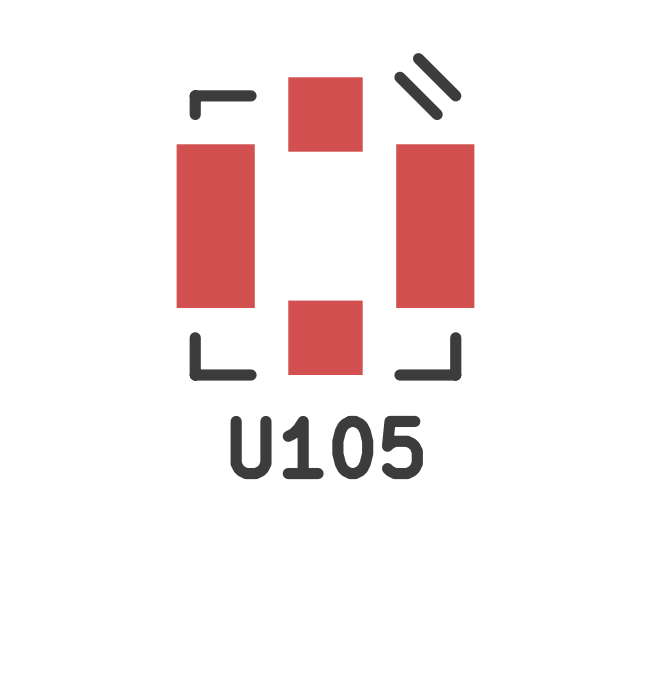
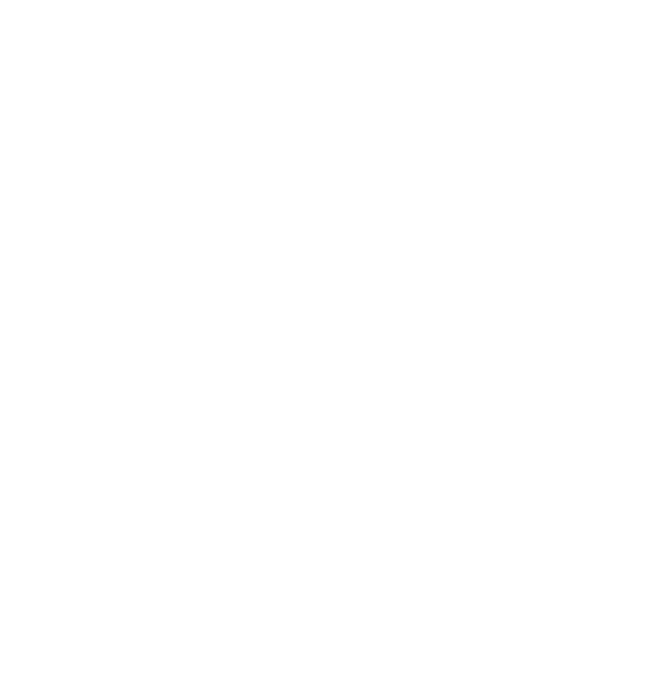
U105: (325, 216) -> none

